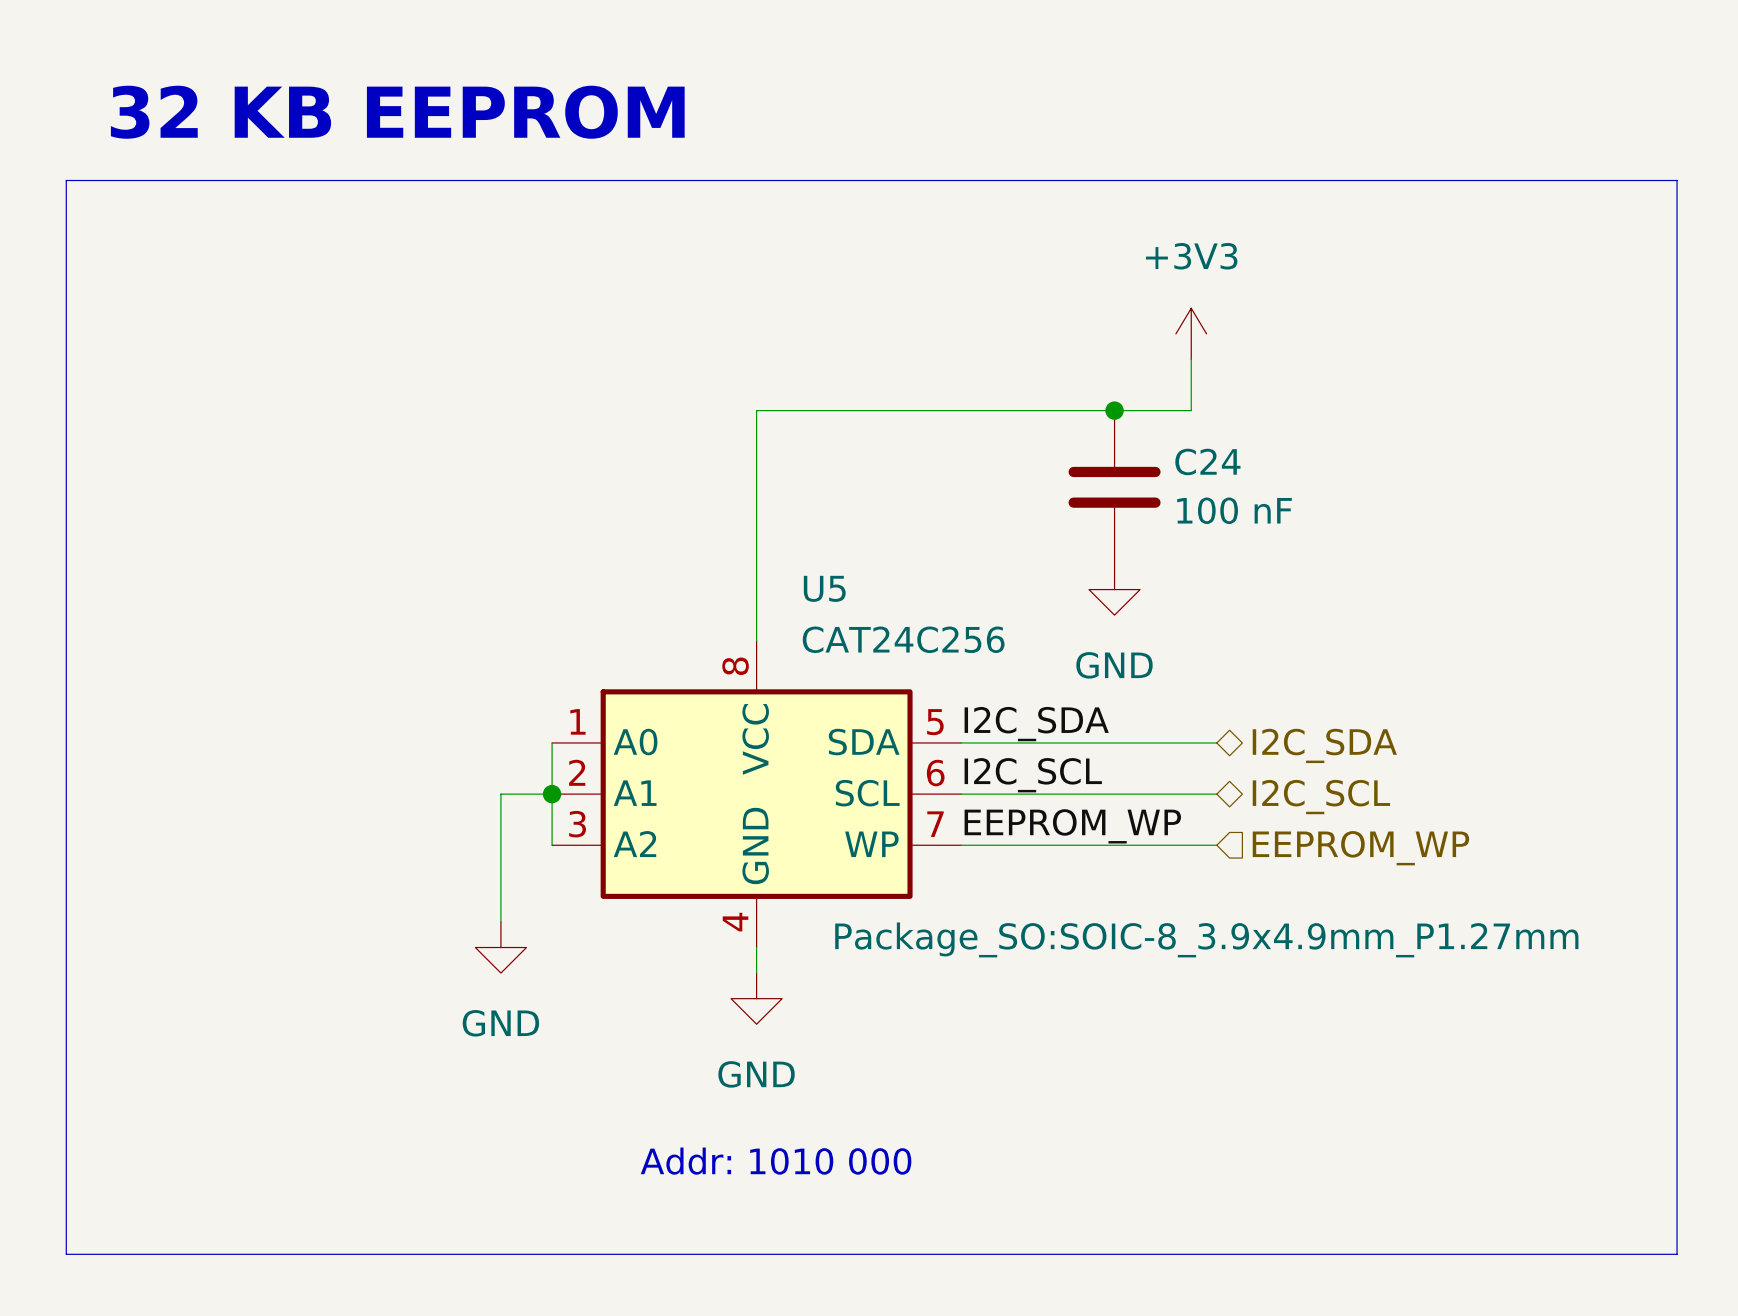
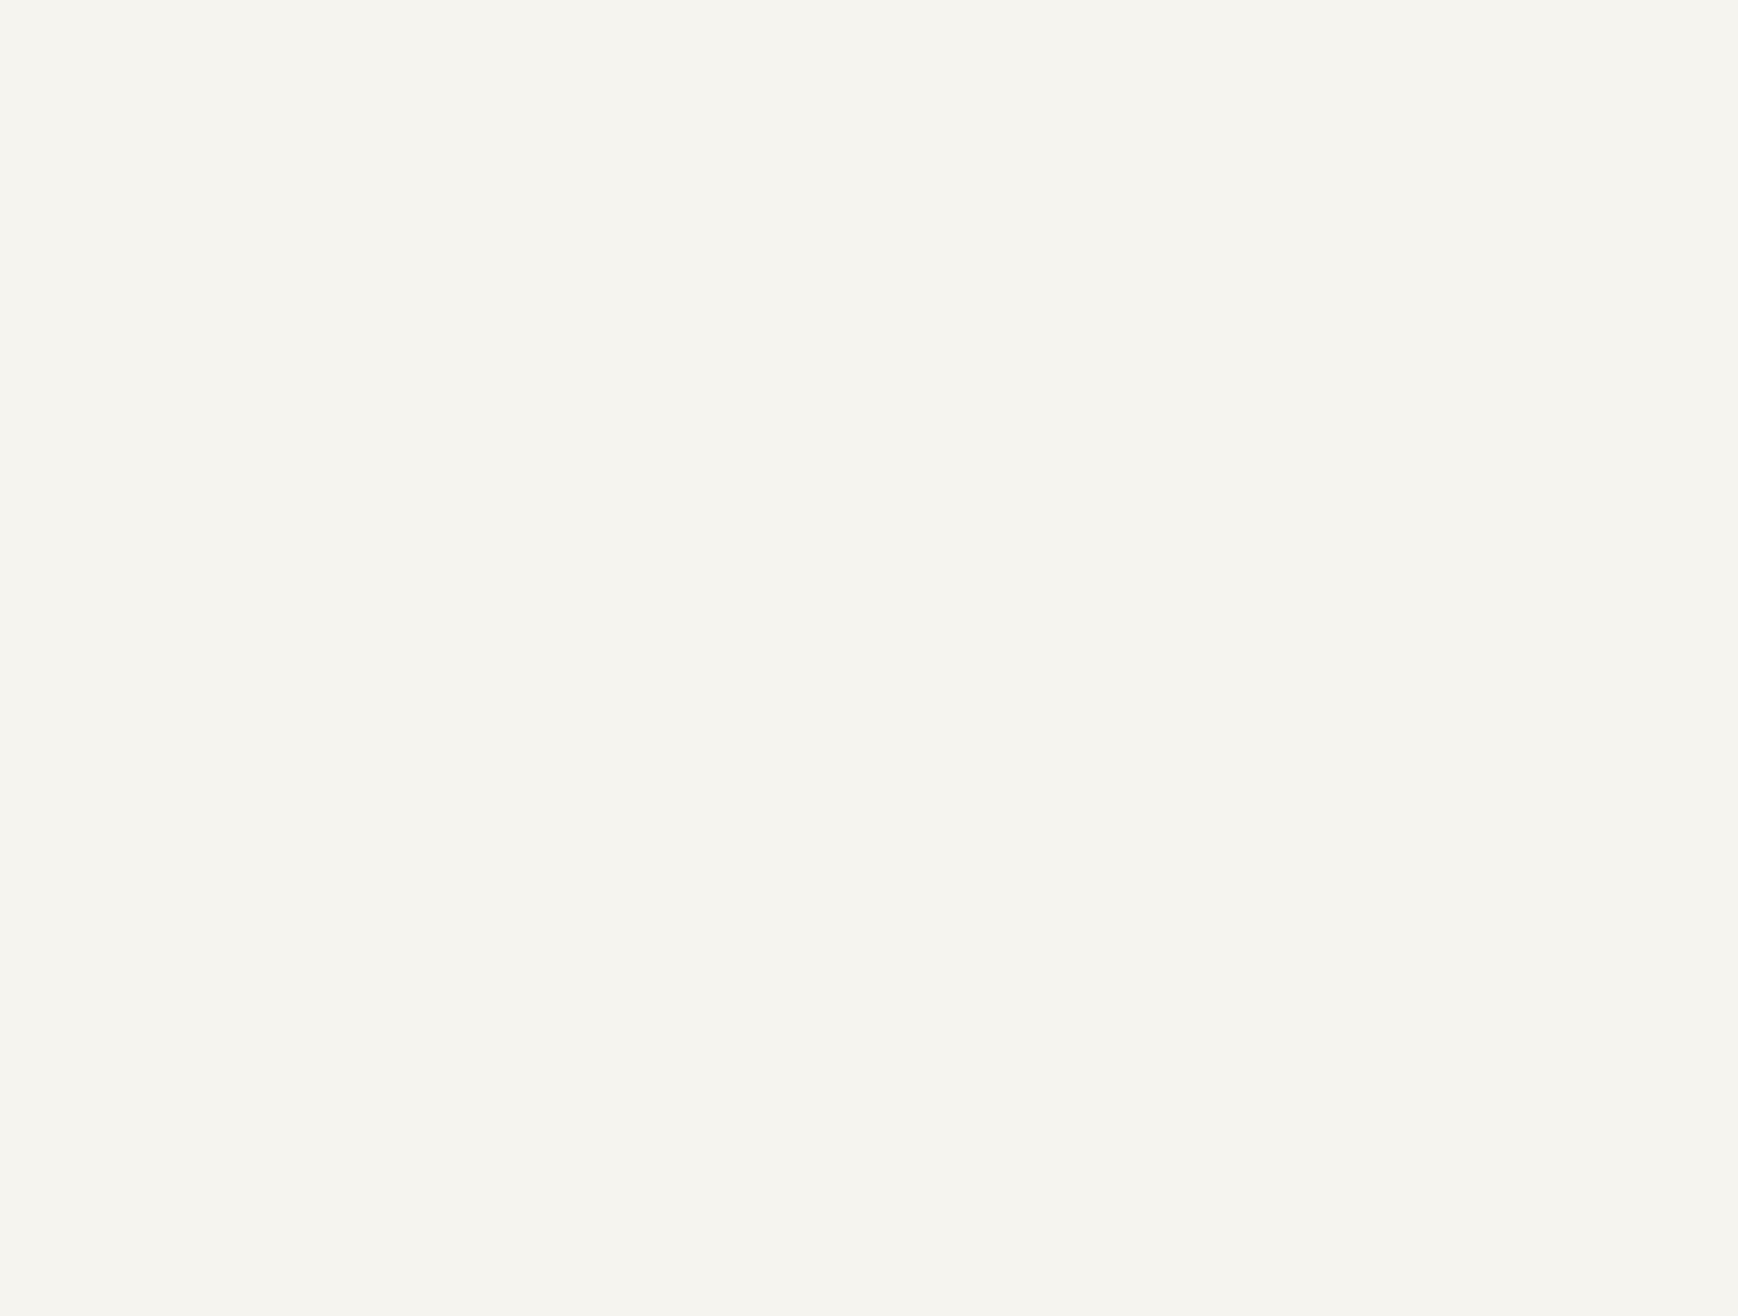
text: 32 KB EEPROM (397, 112) -> none
line: (66, 180) (1677, 180) (1677, 1254) (66, 1254) (66, 180) -> none
power symbol: +3V3 (1191, 333) -> none
wire: (1191, 359) (1191, 410) (756, 410) (756, 640) -> none
junction: (1114, 410) -> none
C24: 100 nF (1114, 487) -> none
power symbol: GND (1114, 589) -> none
label: I2C_SDA (1036, 724) -> none
wire: (552, 742) (552, 845) -> none
wire: (961, 742) (1216, 742) -> none
hierarchical label: I2C_SDA (1324, 745) -> none
label: I2C_SCL (1033, 775) -> none
wire: (552, 794) (500, 794) (500, 921) -> none
junction: (552, 794) -> none
U5: CAT24C256 (756, 794) -> none
wire: (961, 794) (1216, 794) -> none
hierarchical label: I2C_SCL (1321, 797) -> none
label: EEPROM_WP (1072, 826) -> none
wire: (961, 845) (1216, 845) -> none
hierarchical label: EEPROM_WP (1360, 848) -> none
power symbol: GND (500, 947) -> none
wire: (756, 947) (756, 973) -> none
power symbol: GND (756, 998) -> none
text: Addr: 1010 000 (776, 1161) -> none

